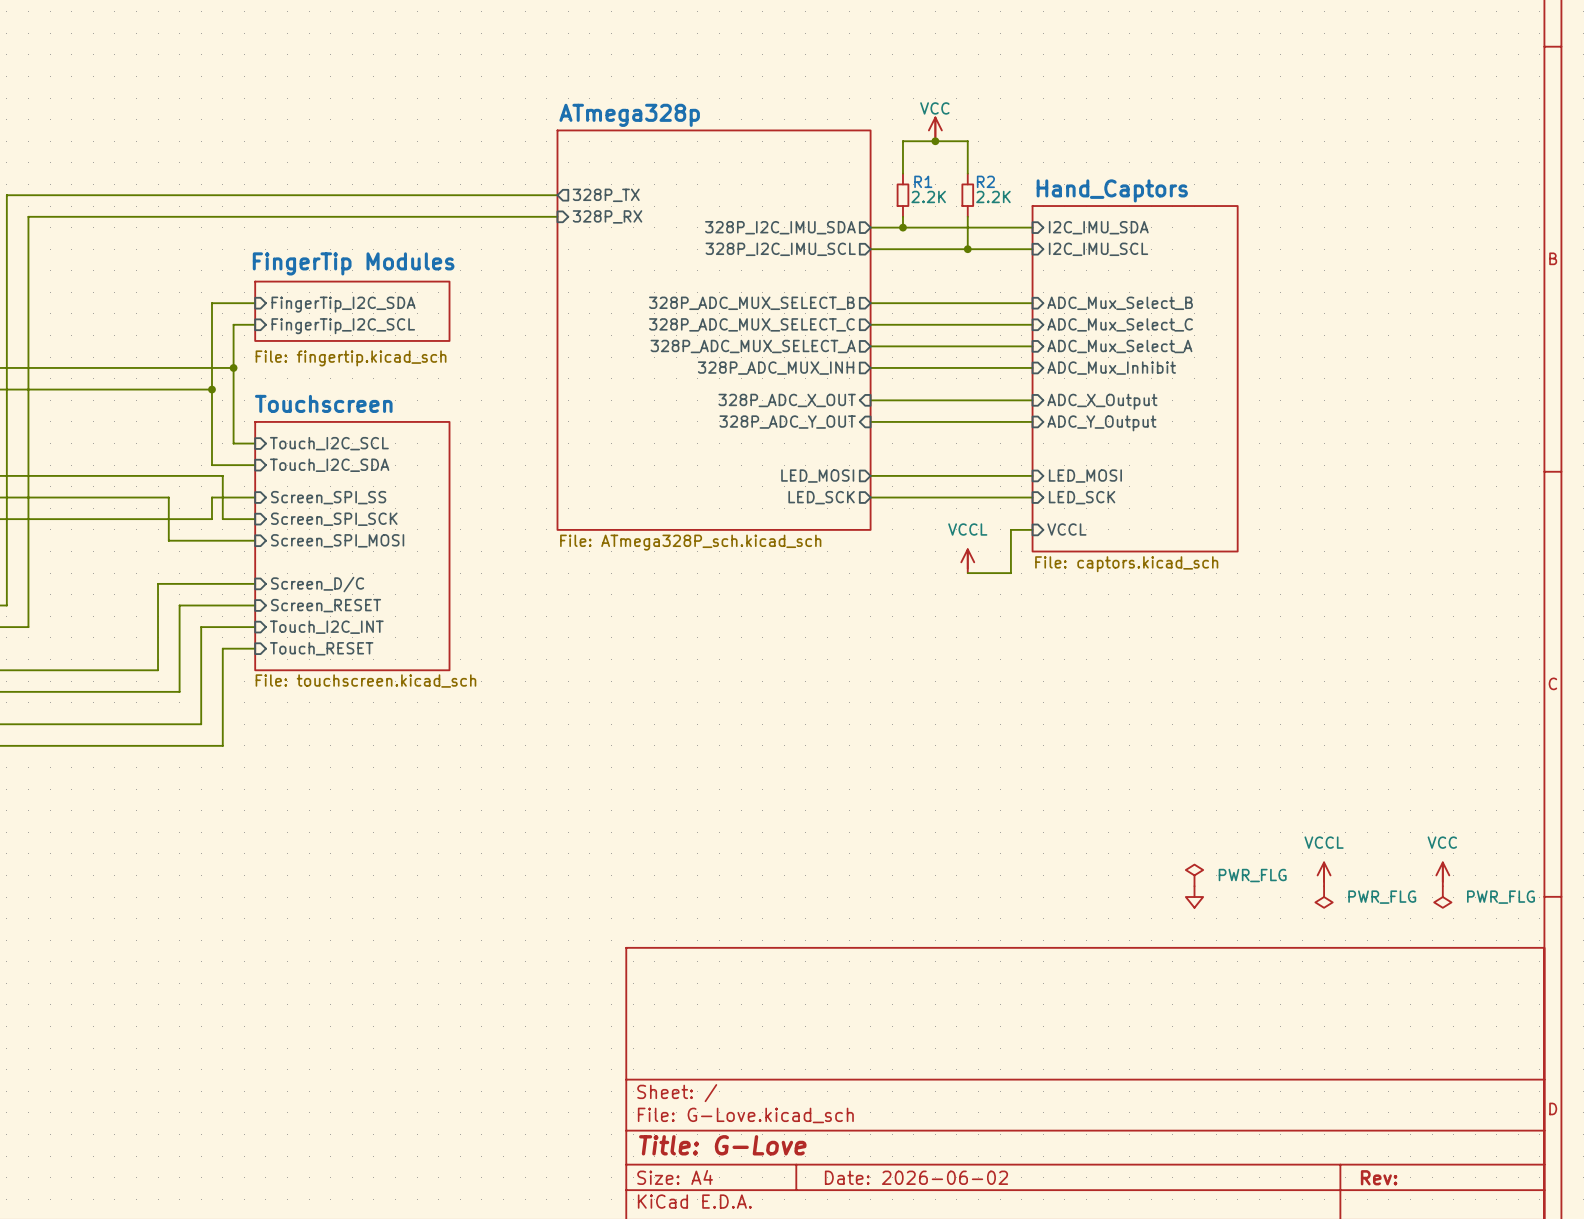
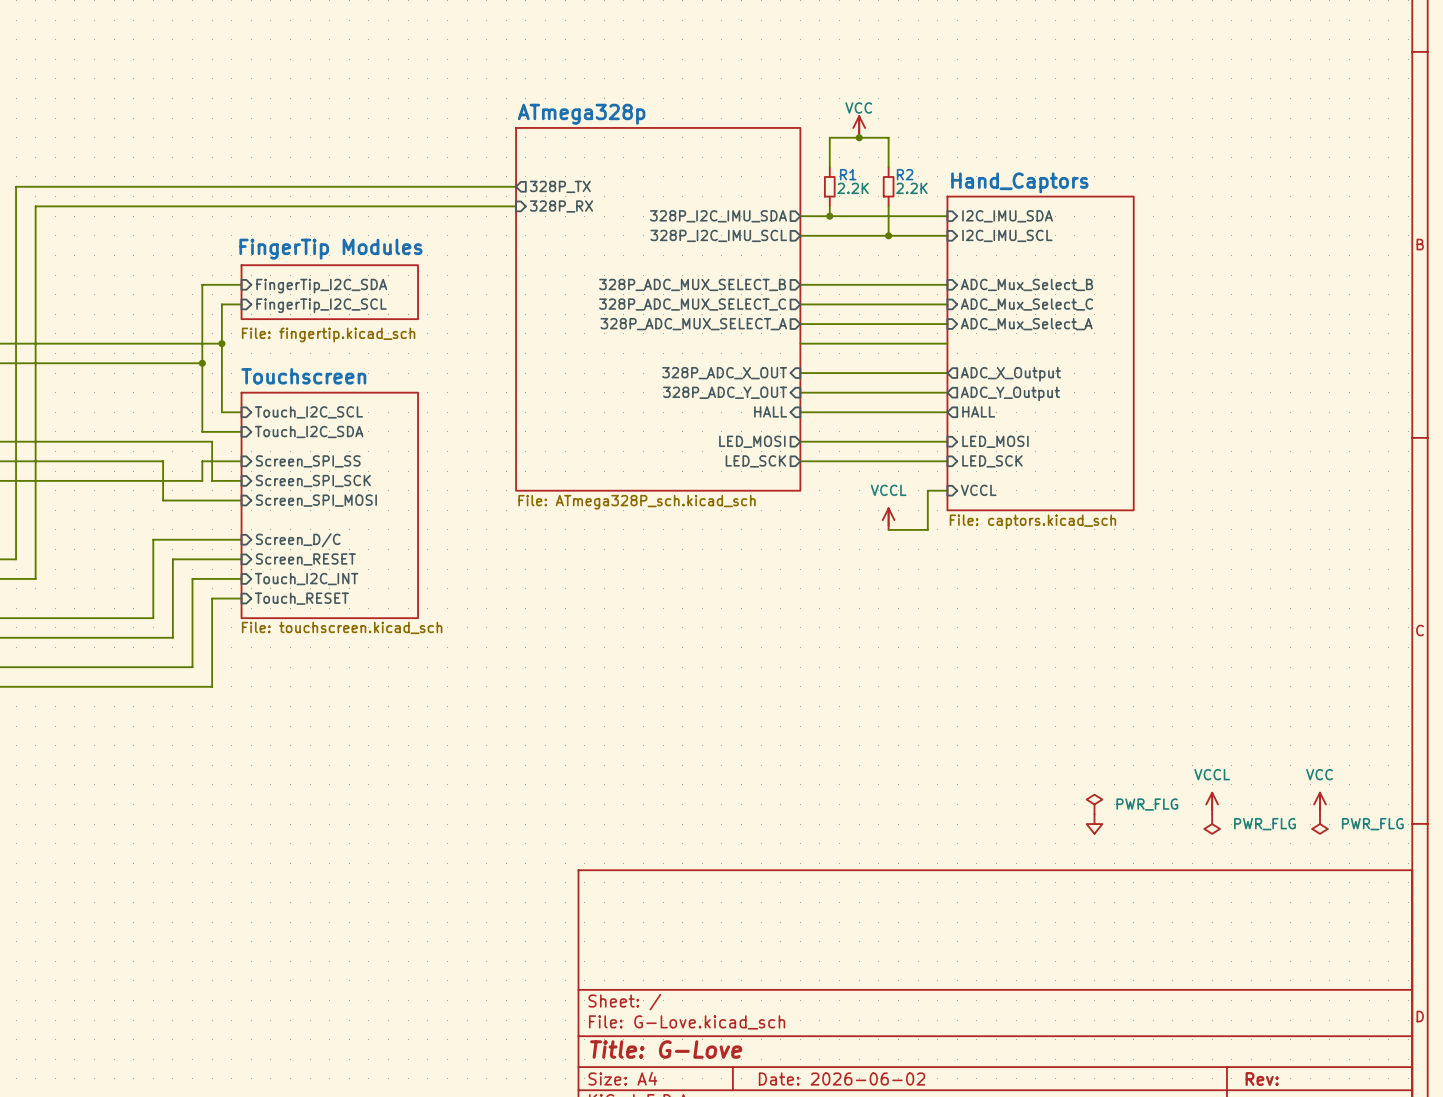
sheet pin: 328P_ADC_MUX_INH (776, 368) -> none
sheet pin: ADC_Mux_Inhibit (1111, 368) -> none
sheet pin shape: input (1102, 401) -> output (1010, 374)
sheet pin shape: input (1101, 423) -> output (1010, 393)
sheet pin: none -> HALL (770, 411)
wire: none -> (800, 412) (947, 412)
sheet pin: none -> HALL (978, 411)

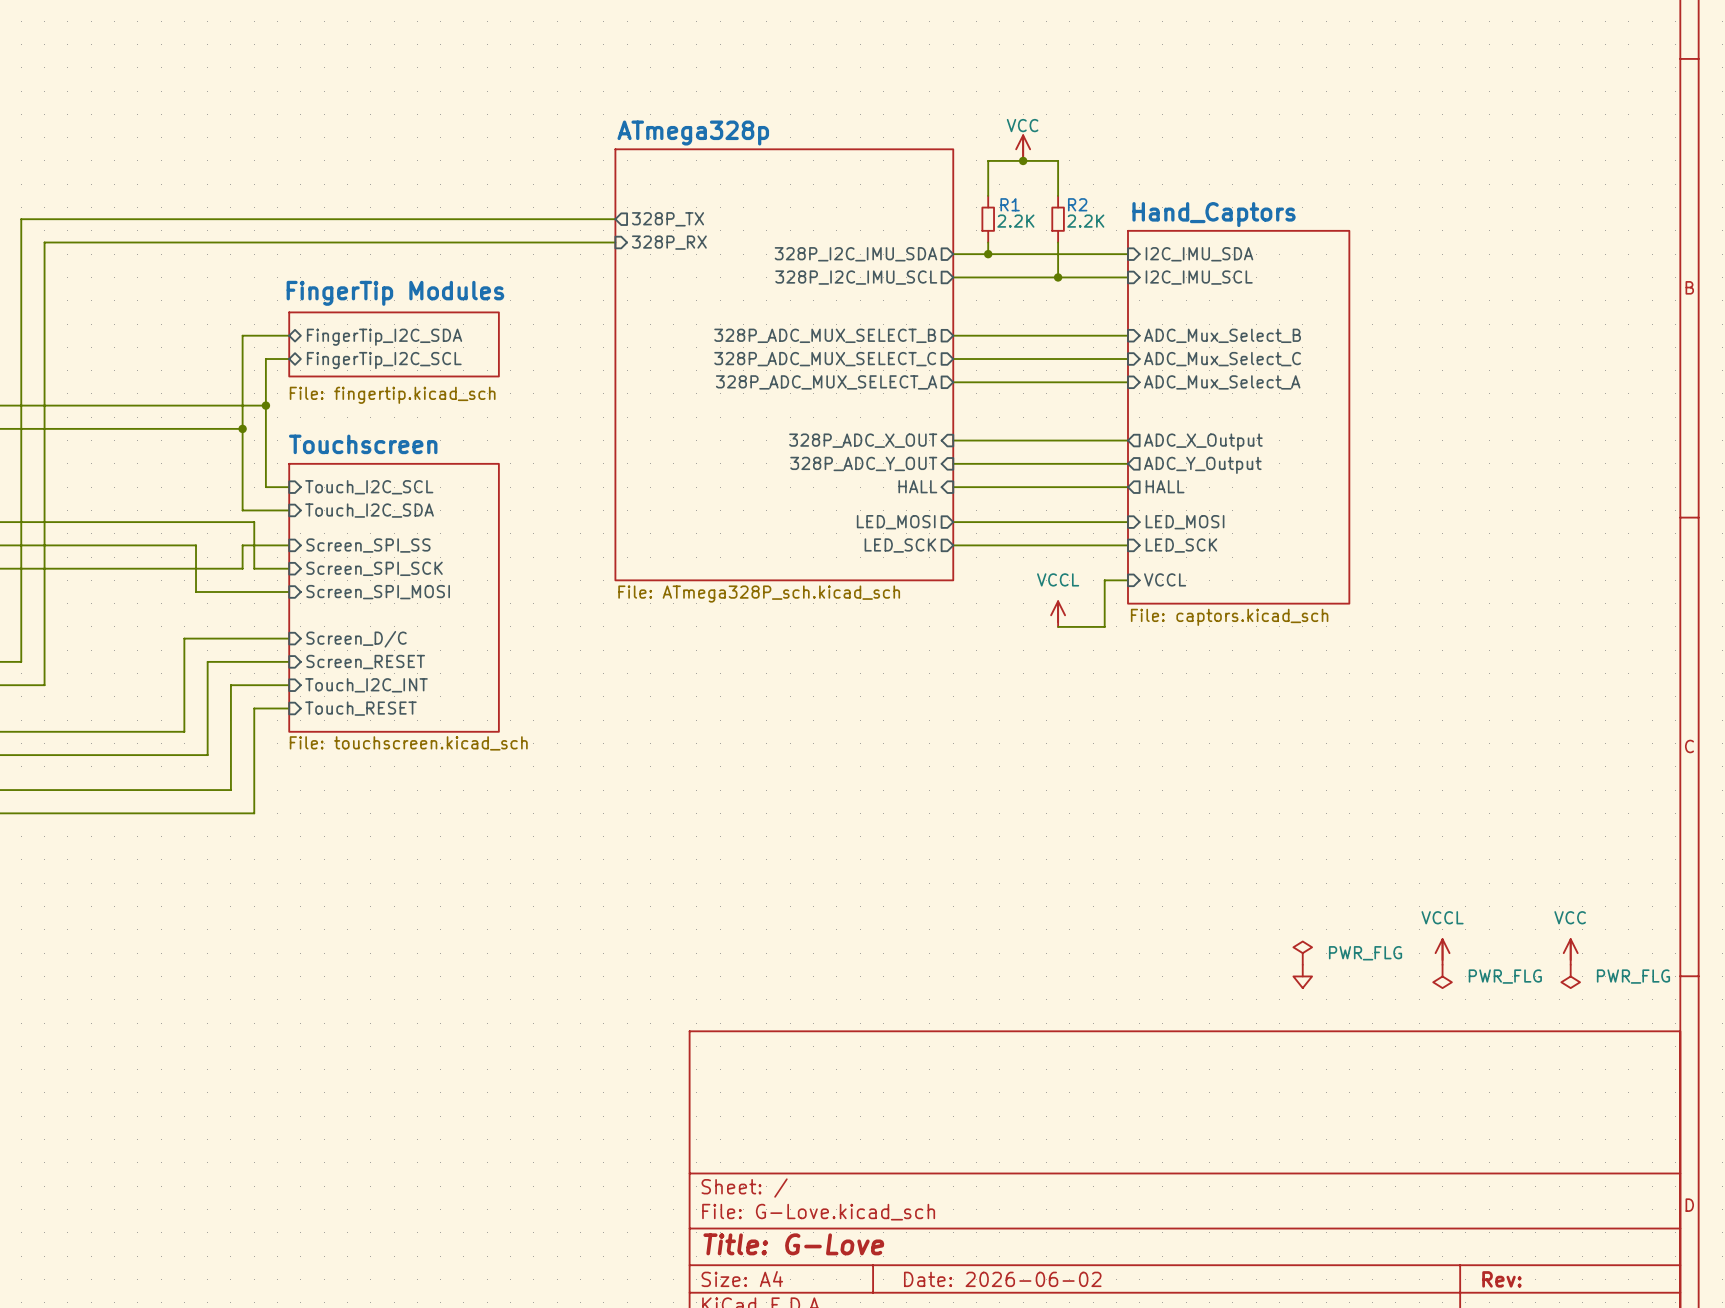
sheet pin shape: input (321, 286) -> bidirectional (384, 337)
sheet pin shape: input (321, 305) -> bidirectional (384, 360)
wire: (800, 343) (947, 343) -> none

